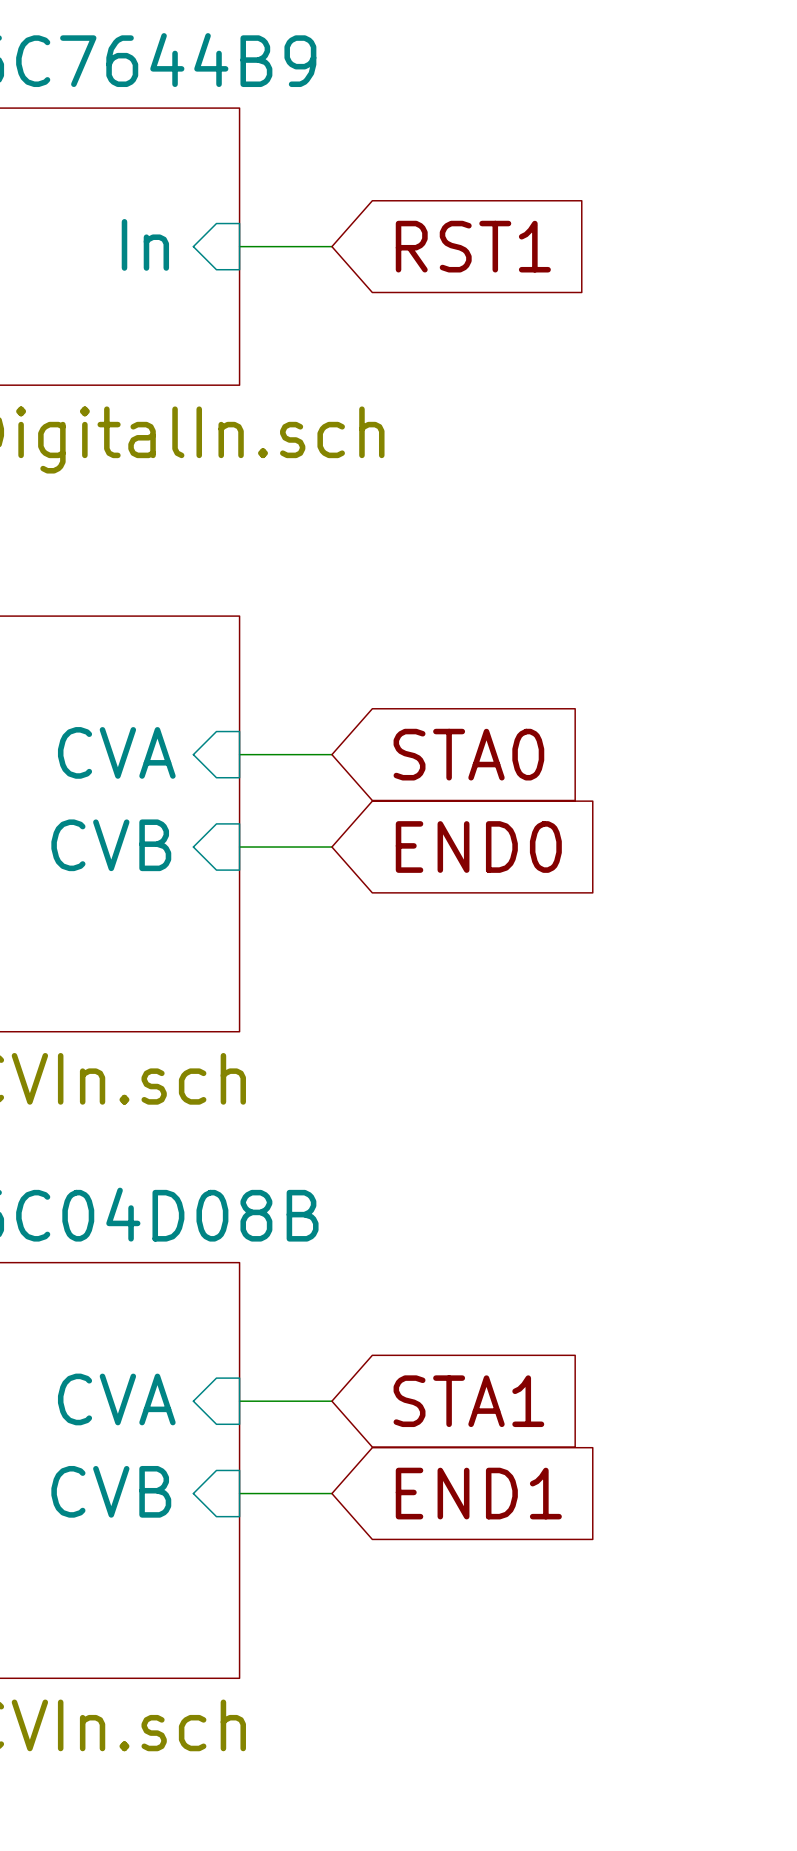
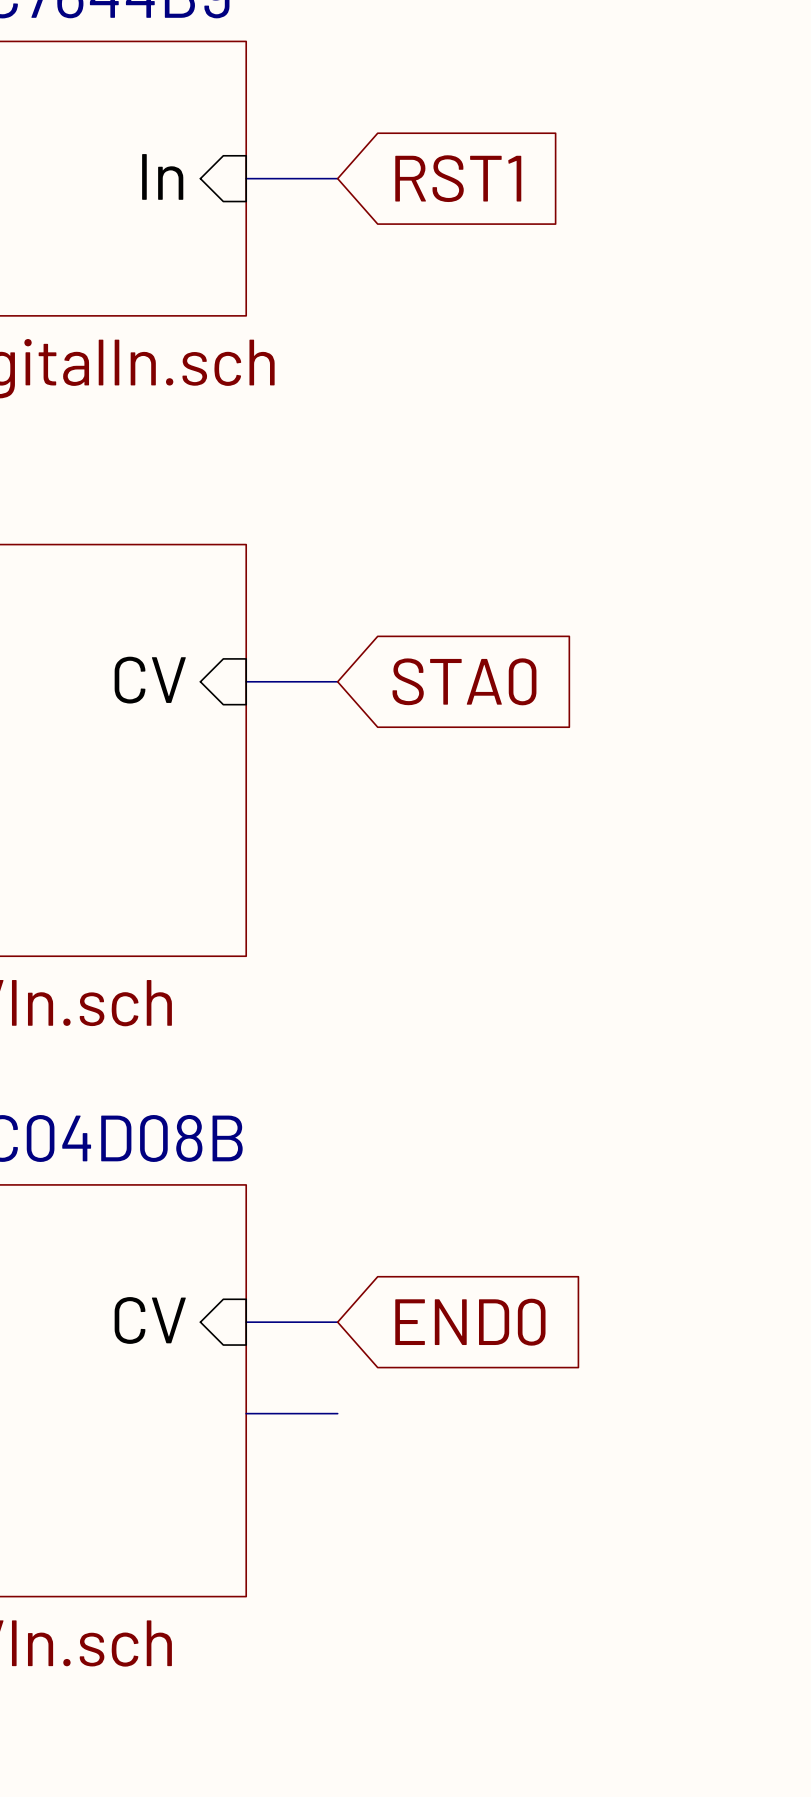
sheet pin: CVA (116, 752) -> CV (150, 680)
sheet pin: CVB (111, 845) -> none
wire: (239, 847) (331, 847) -> none
global label: END0 (478, 847) -> none
sheet pin: CVA (116, 1399) -> CV (150, 1320)
global label: STA1 (468, 1401) -> END0 (470, 1322)
sheet pin: CVB (111, 1491) -> none
global label: END1 (478, 1493) -> none

